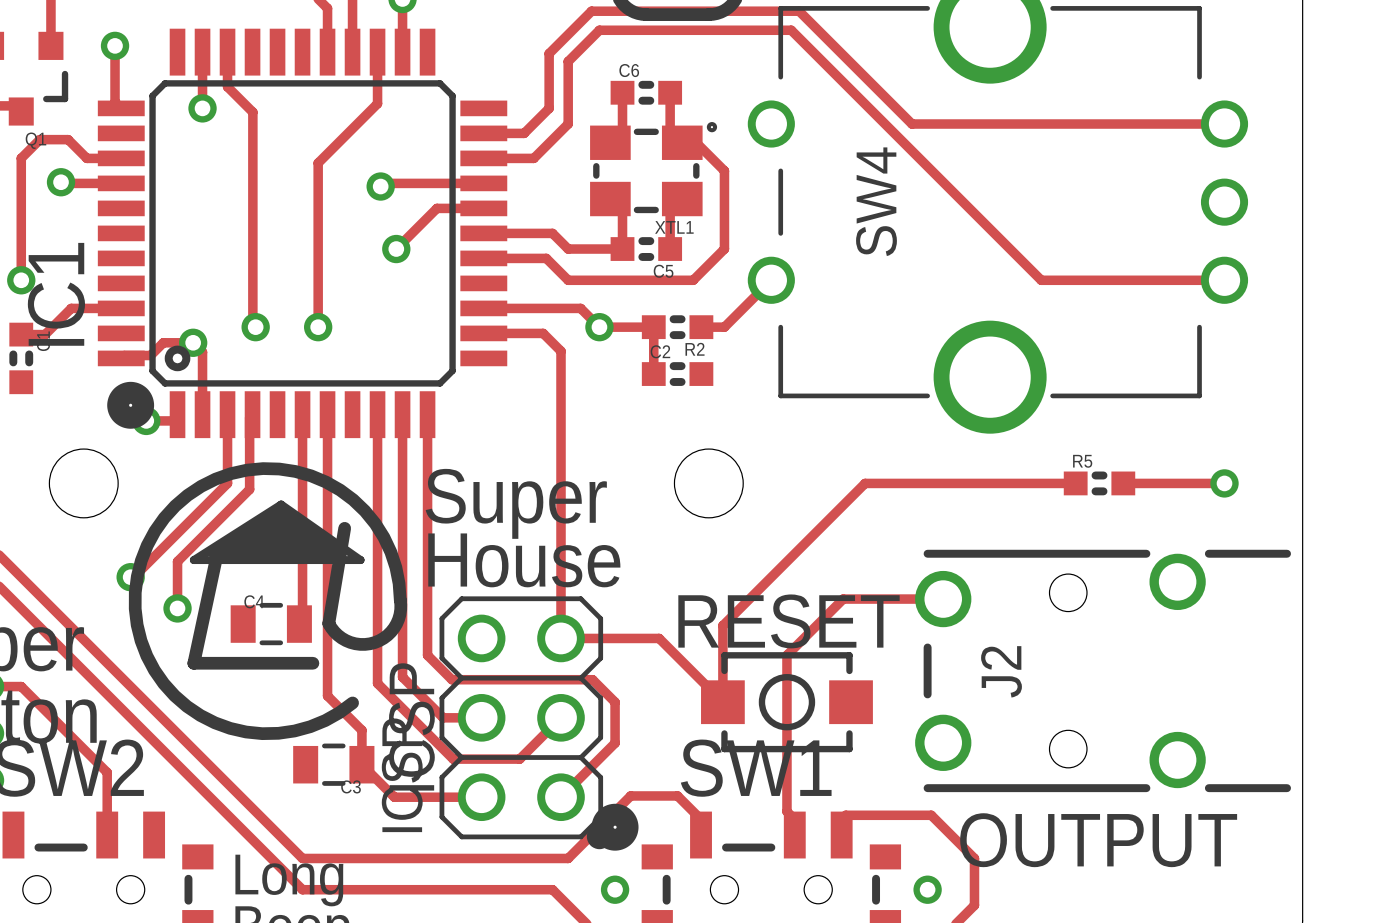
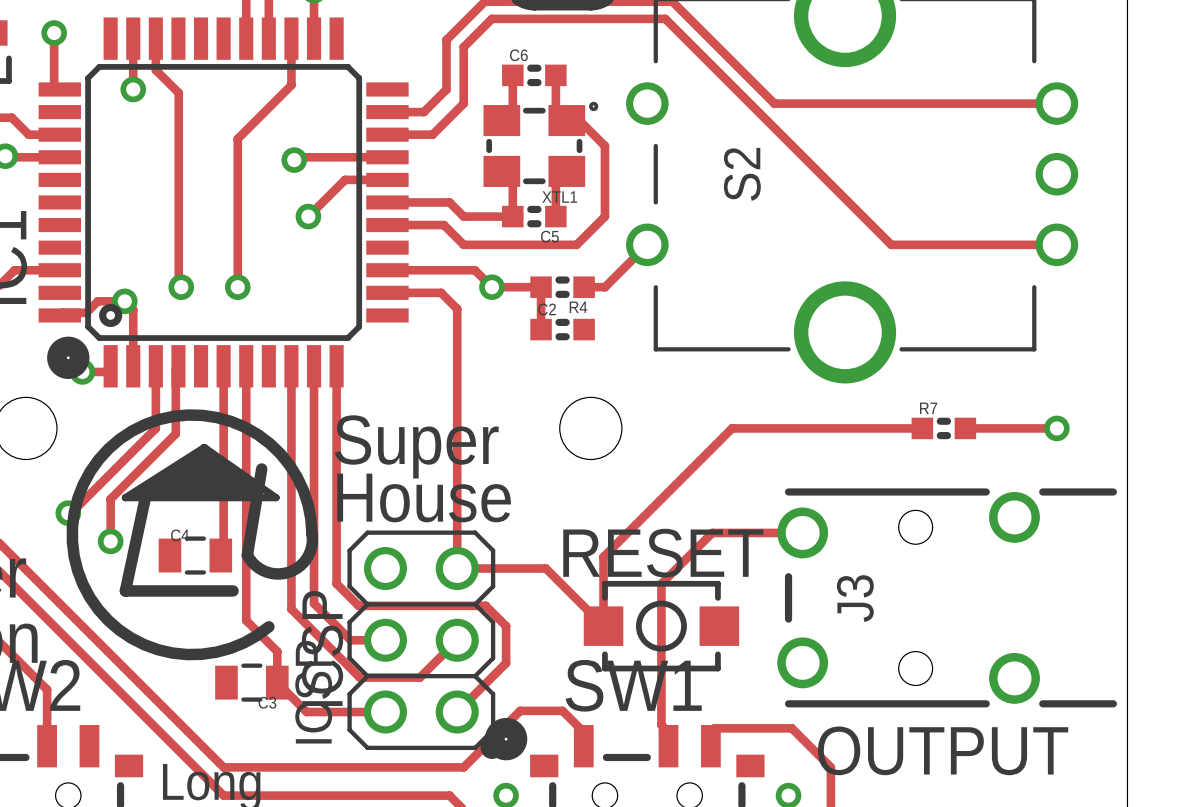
SW4 name: SW4 (876, 201) -> S2 (742, 174)
R2 name: R2 (695, 349) -> R4 (578, 307)
R5 name: R5 (1082, 461) -> R7 (928, 408)
J2 name: J2 (1001, 671) -> J3 (855, 598)

